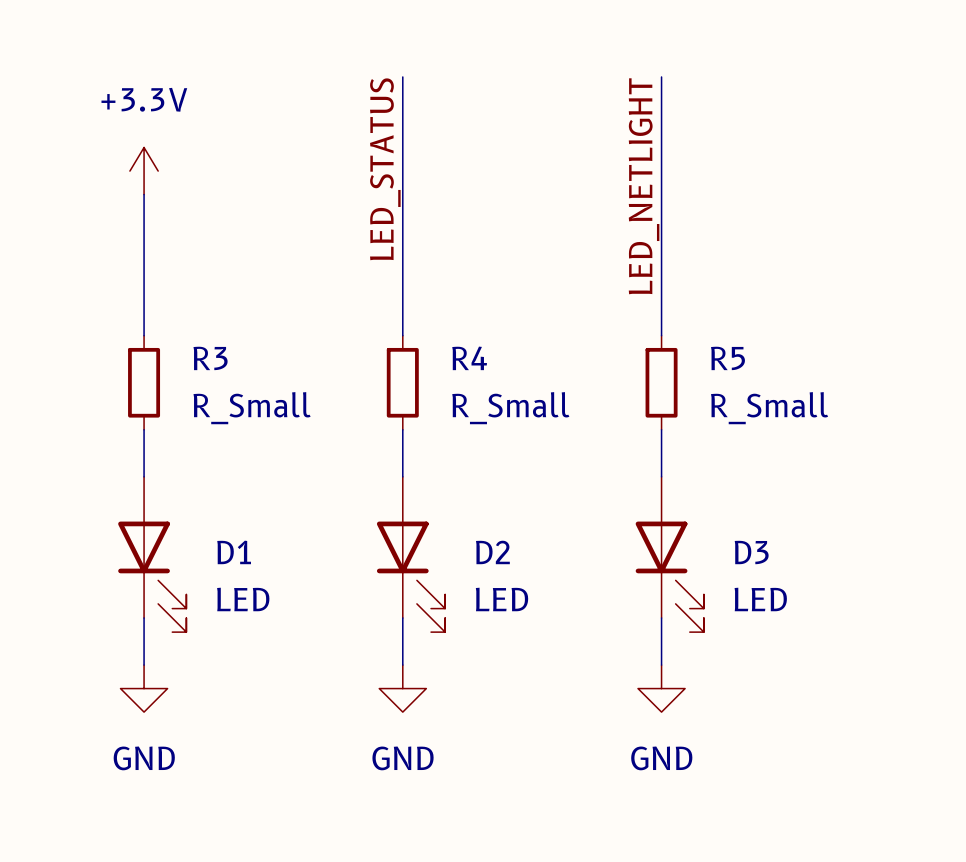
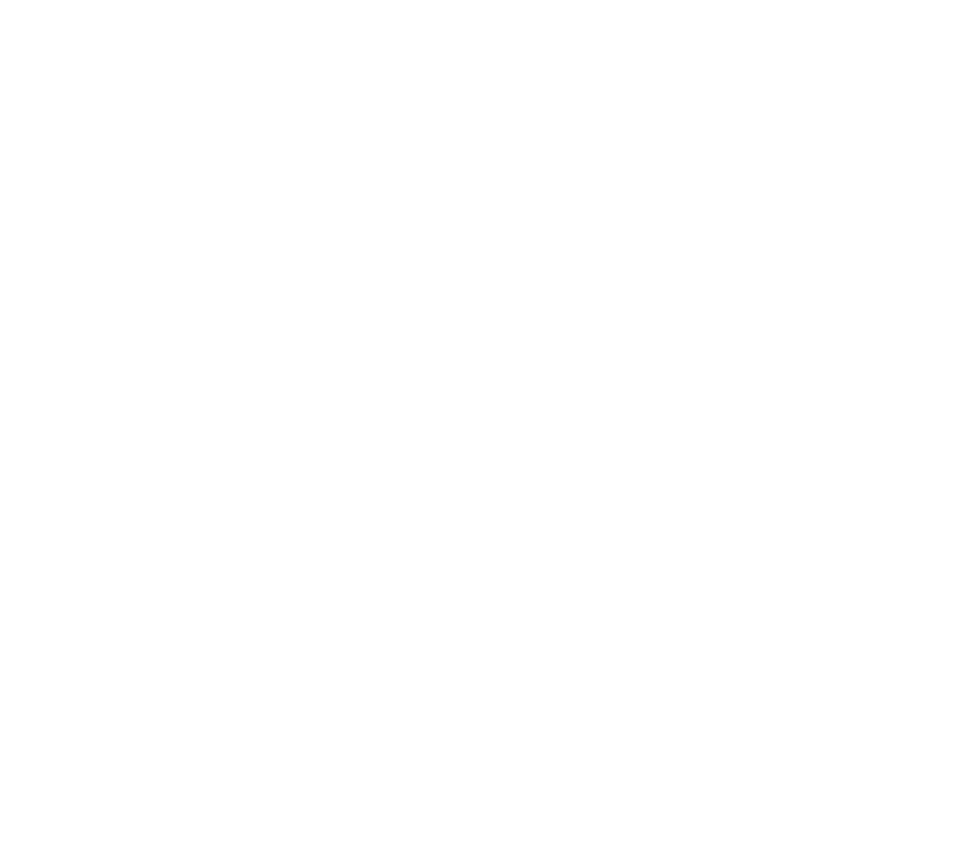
wire: (402, 76) (402, 335) -> none
wire: (661, 76) (661, 335) -> none
label: LED_STATUS (385, 169) -> none
power symbol: +3.3V (144, 171) -> none
label: LED_NETLIGHT (644, 186) -> none
wire: (144, 194) (144, 335) -> none
R3: R_Small (144, 382) -> none
R4: R_Small (402, 382) -> none
R5: R_Small (661, 382) -> none
wire: (144, 429) (144, 476) -> none
wire: (402, 429) (402, 476) -> none
wire: (661, 429) (661, 476) -> none
D1: LED (152, 554) -> none
D2: LED (411, 554) -> none
D3: LED (669, 554) -> none
wire: (144, 618) (144, 665) -> none
wire: (402, 618) (402, 665) -> none
wire: (661, 618) (661, 665) -> none
power symbol: GND (144, 688) -> none
power symbol: GND (402, 688) -> none
power symbol: GND (661, 688) -> none

